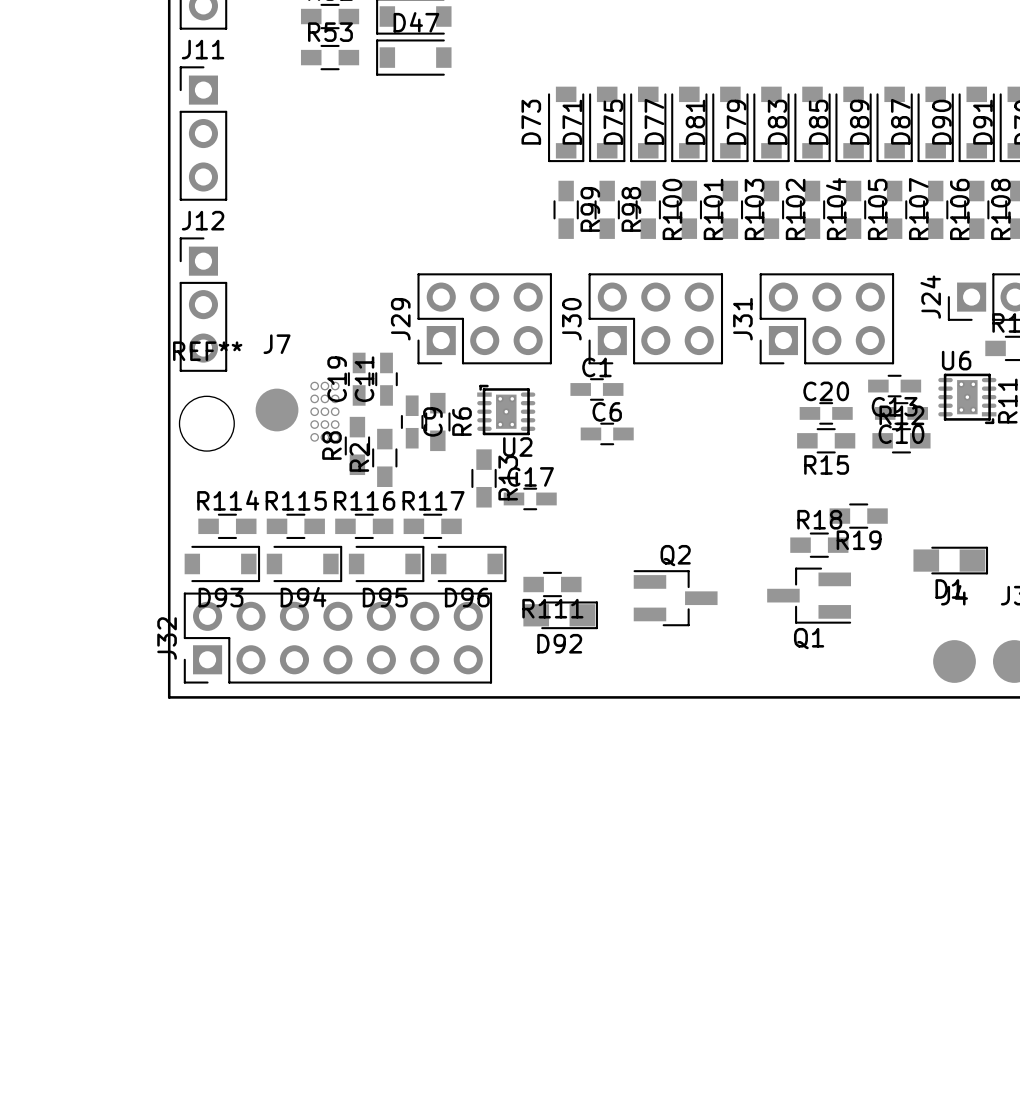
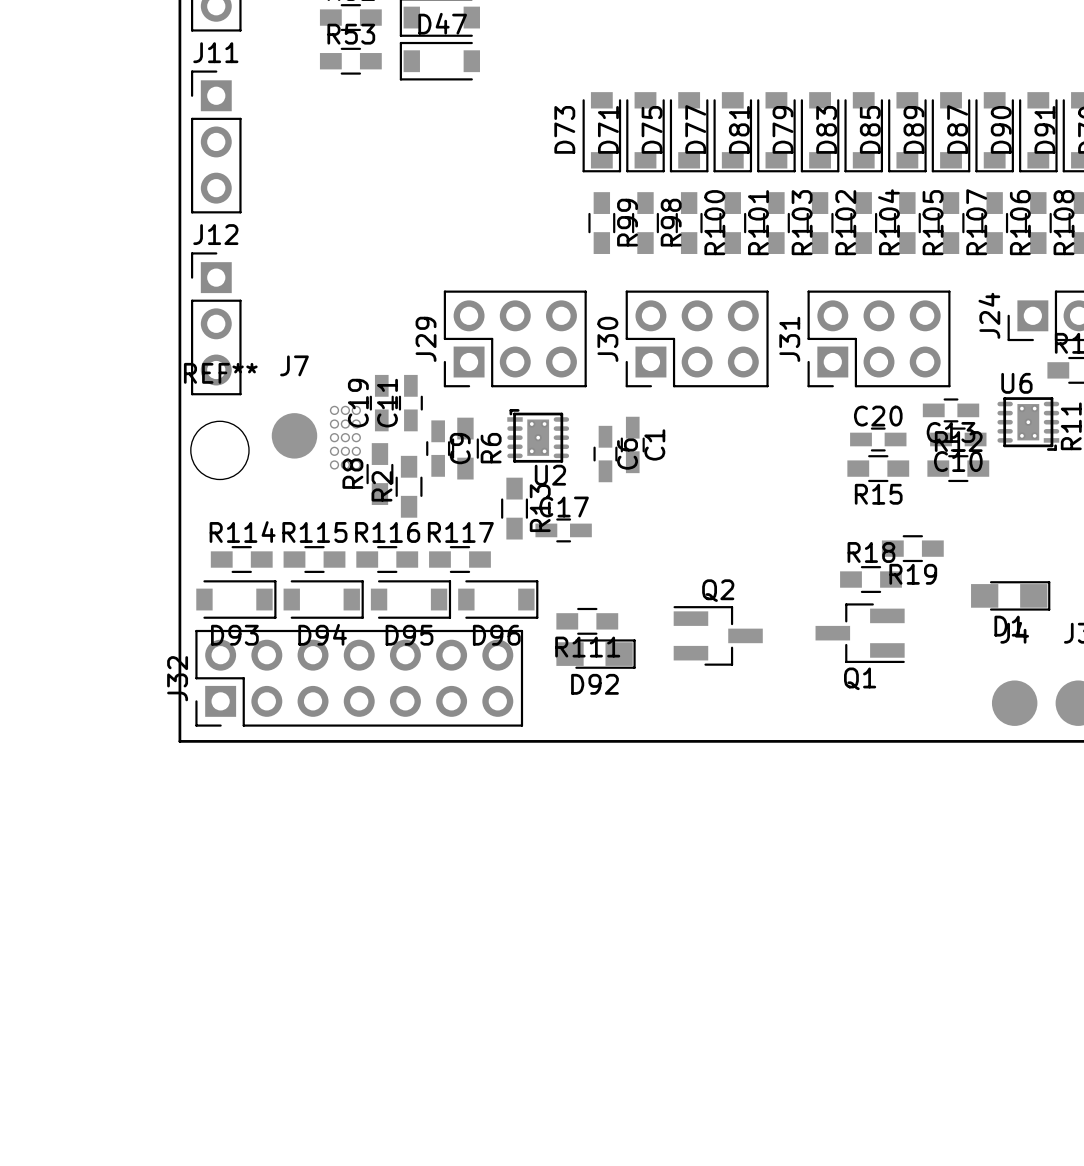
C1 rotation: 0° (596, 389) -> 90° clockwise (632, 444)
C6 rotation: 0° (607, 433) -> 90° clockwise (605, 454)
C6 position: (607, 433) -> (605, 454)

